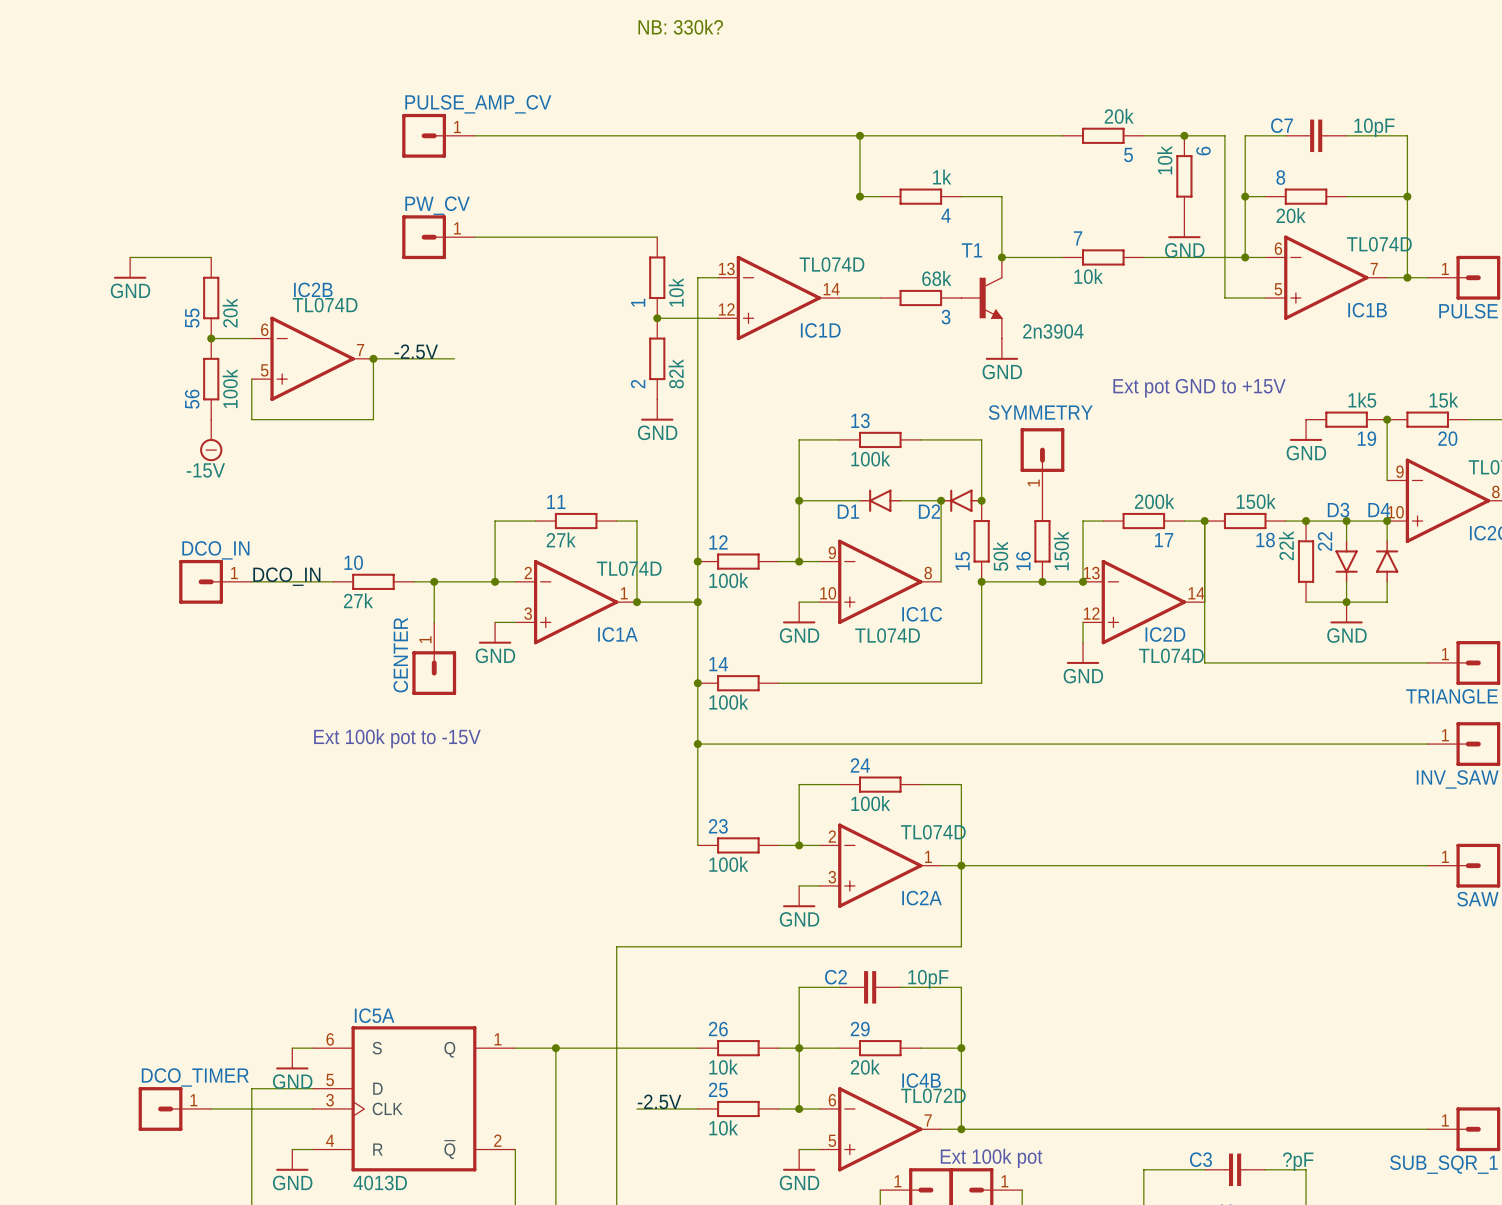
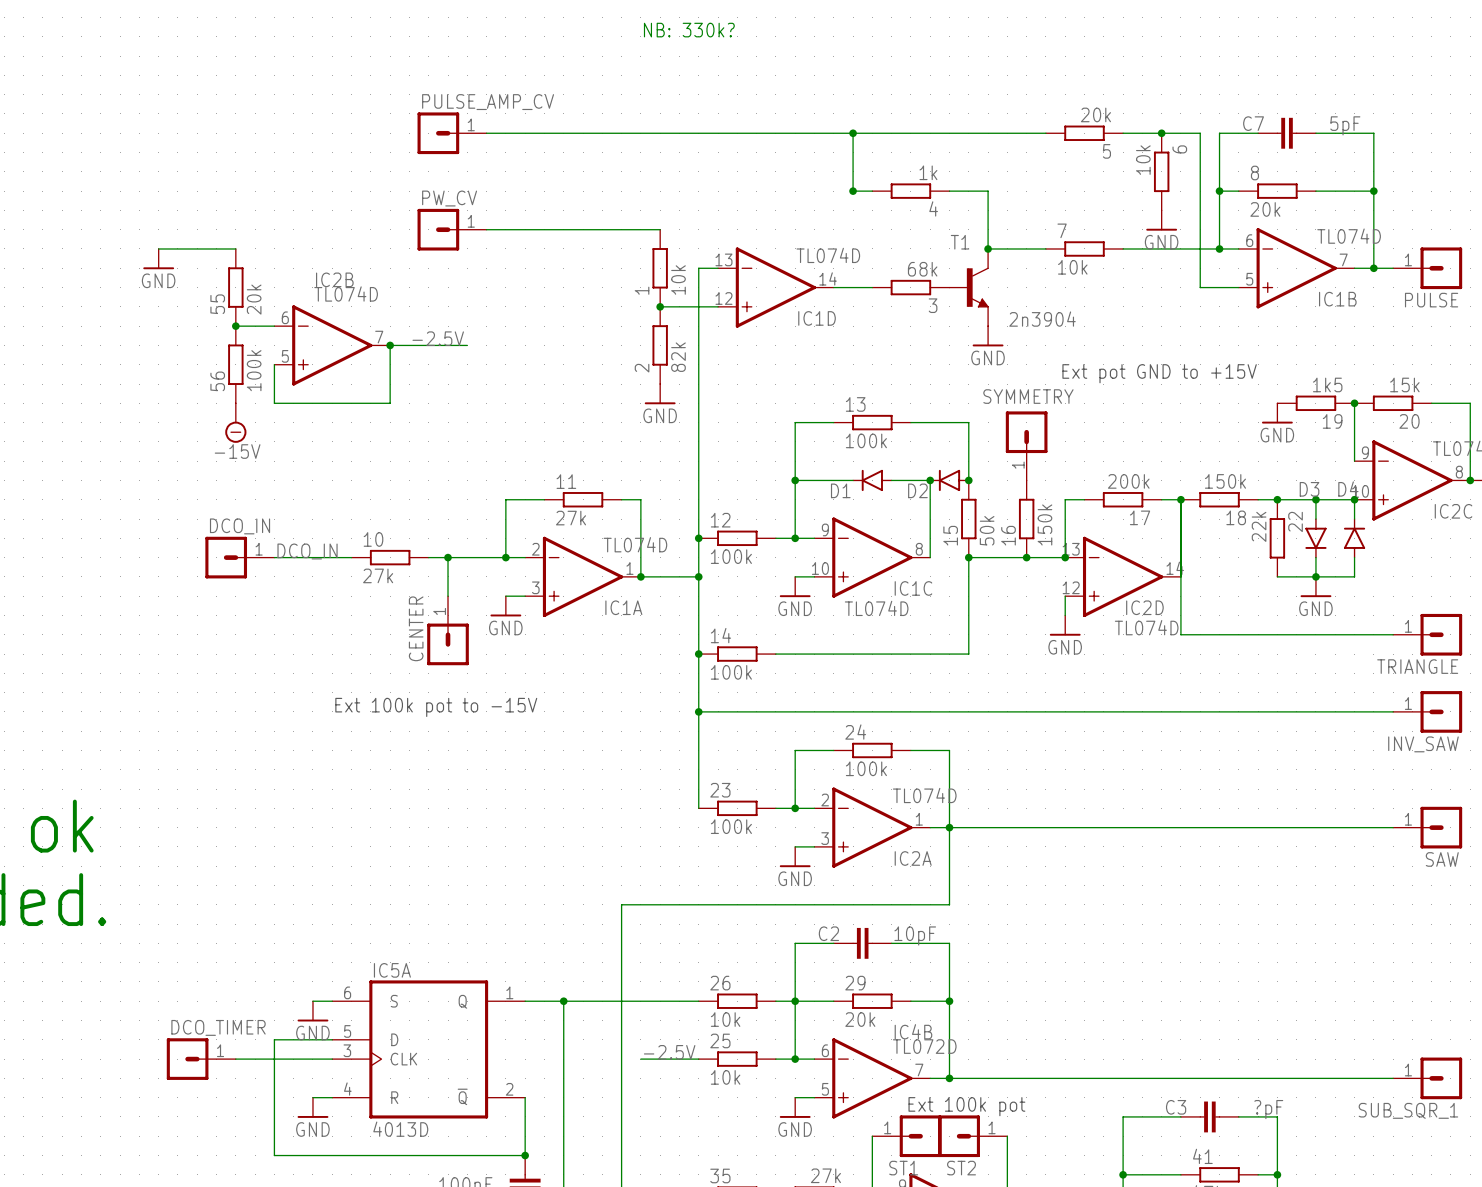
C7 value: 10pF (1374, 127) -> 5pF (1345, 125)

